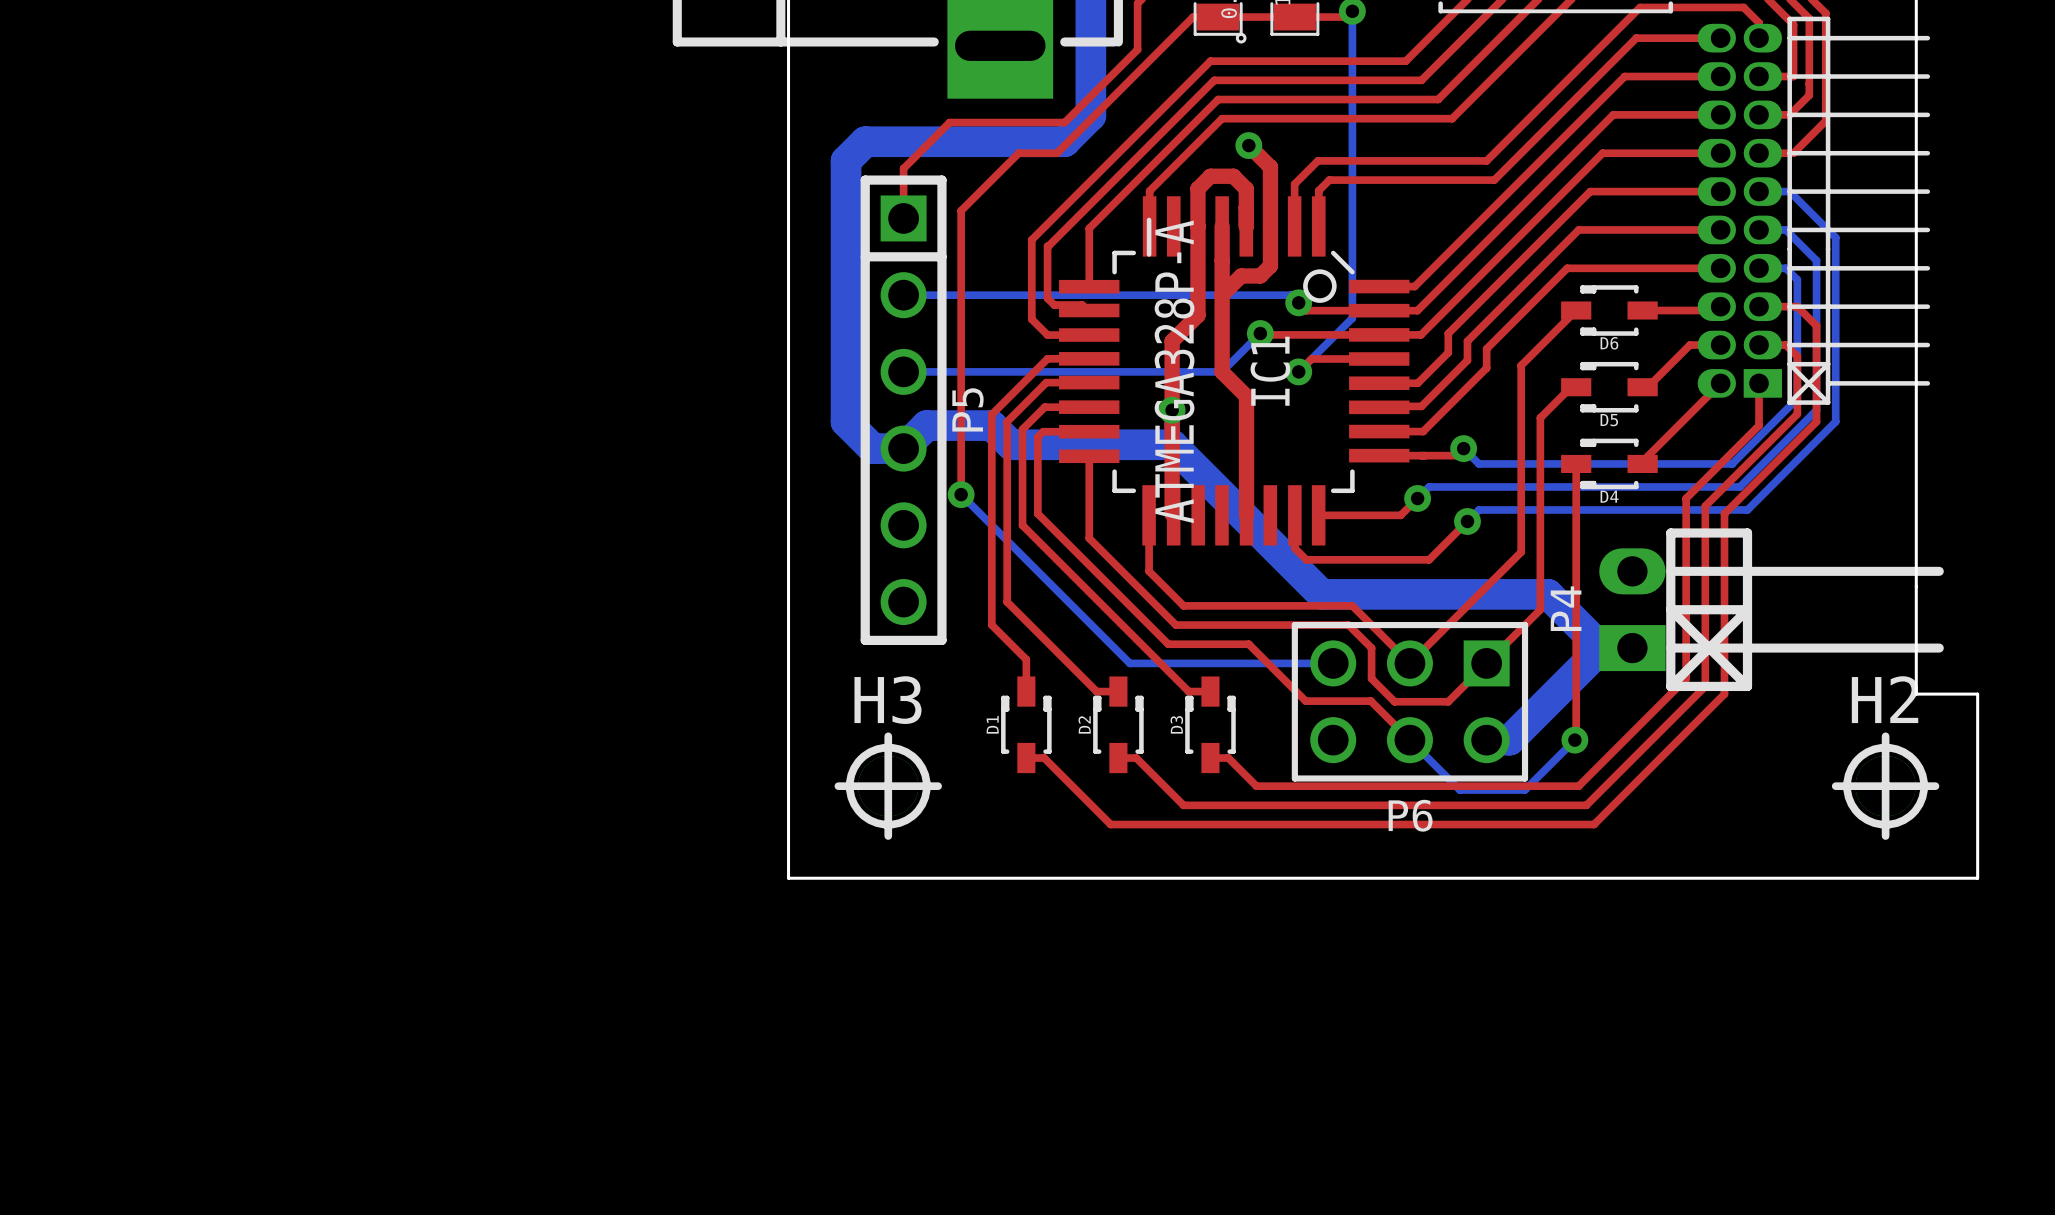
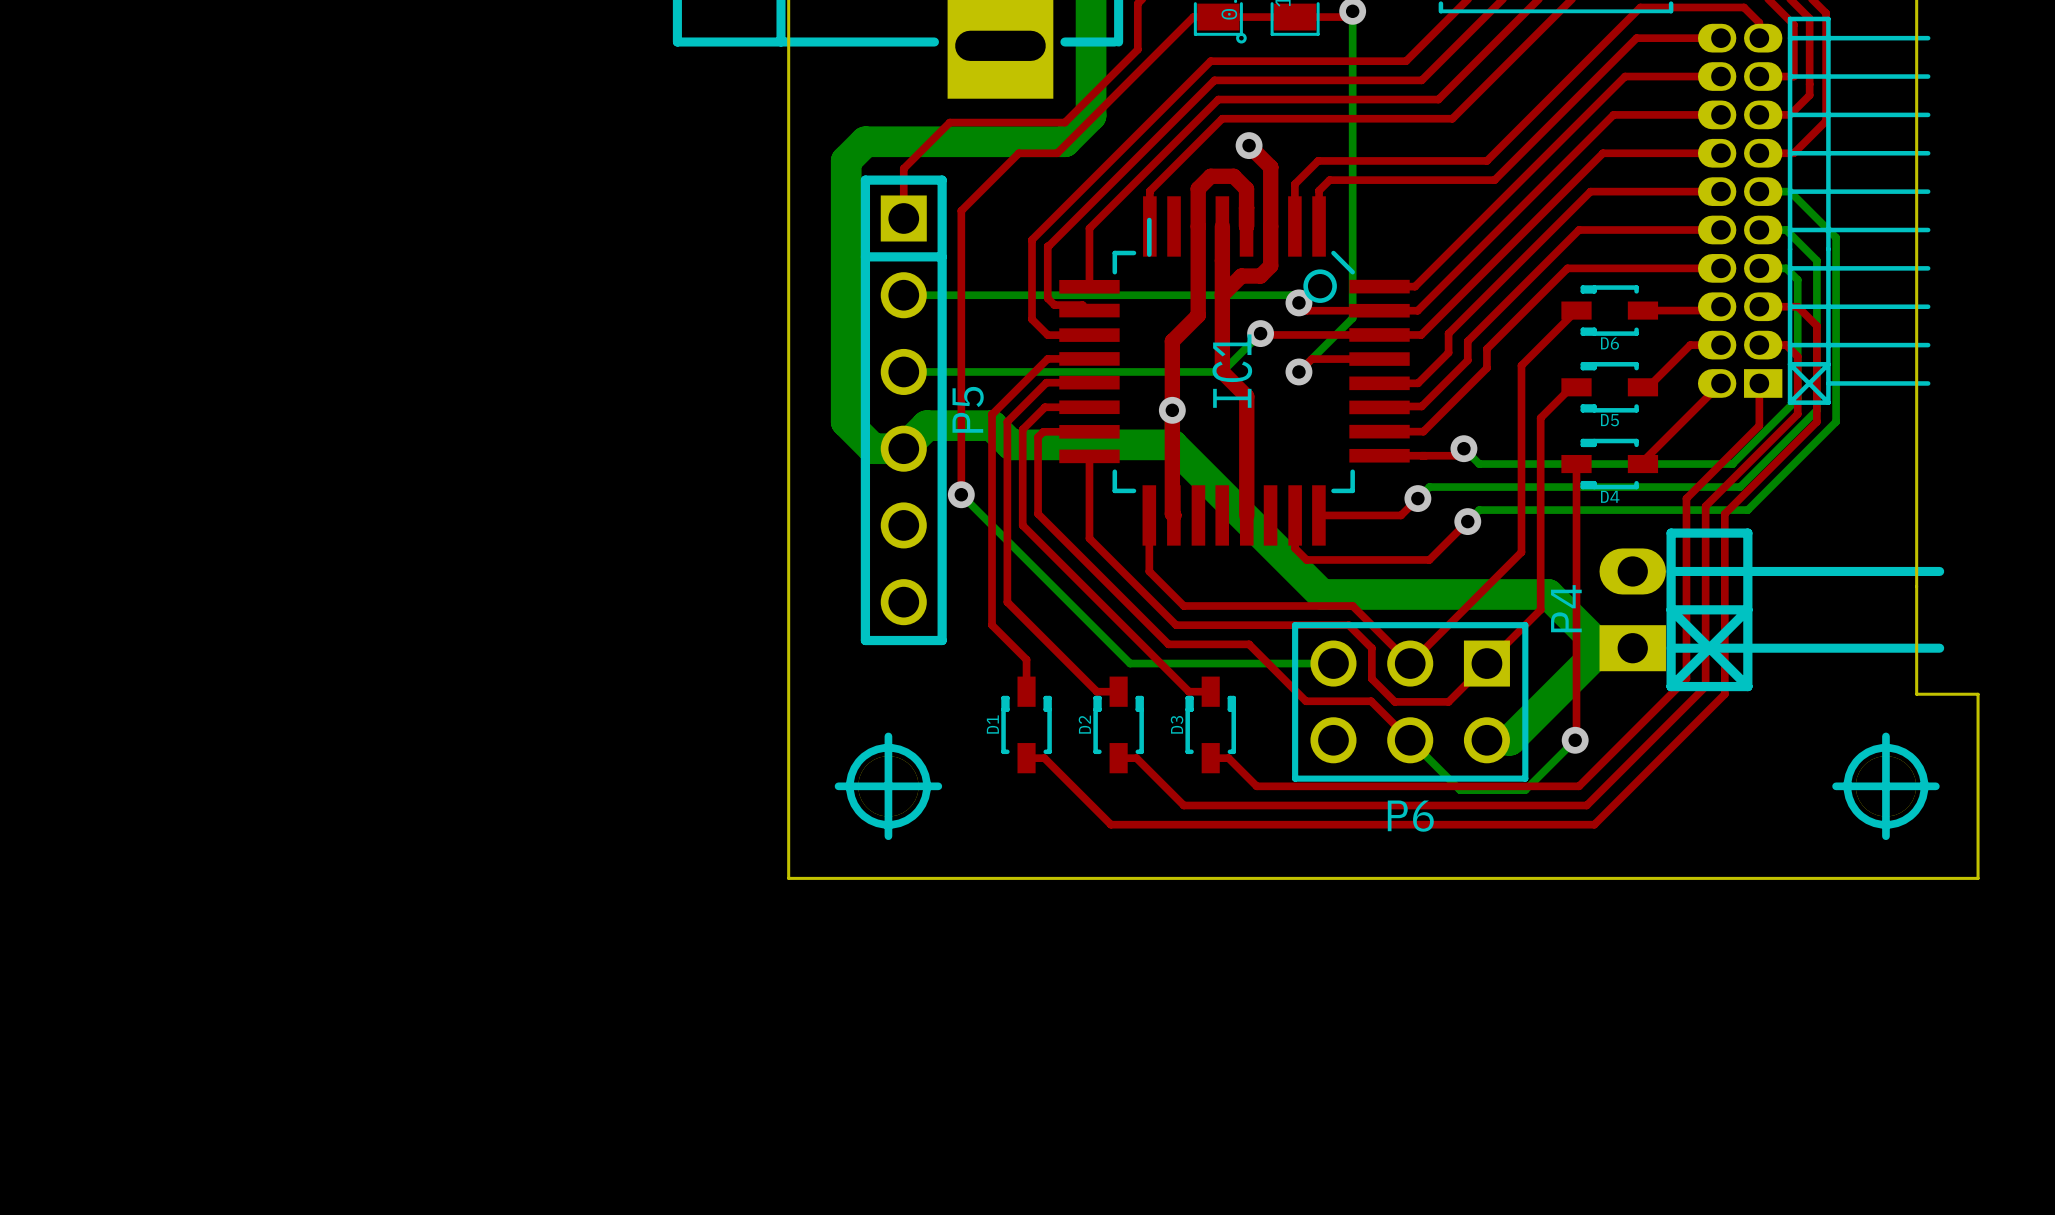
IC1 value: ATMEGA328P-A (1174, 371) -> none
IC1 name position: IC1 (1270, 371) -> IC1 (1232, 371)
H2 name: H2 (1885, 699) -> none
H3 name: H3 (887, 700) -> none

